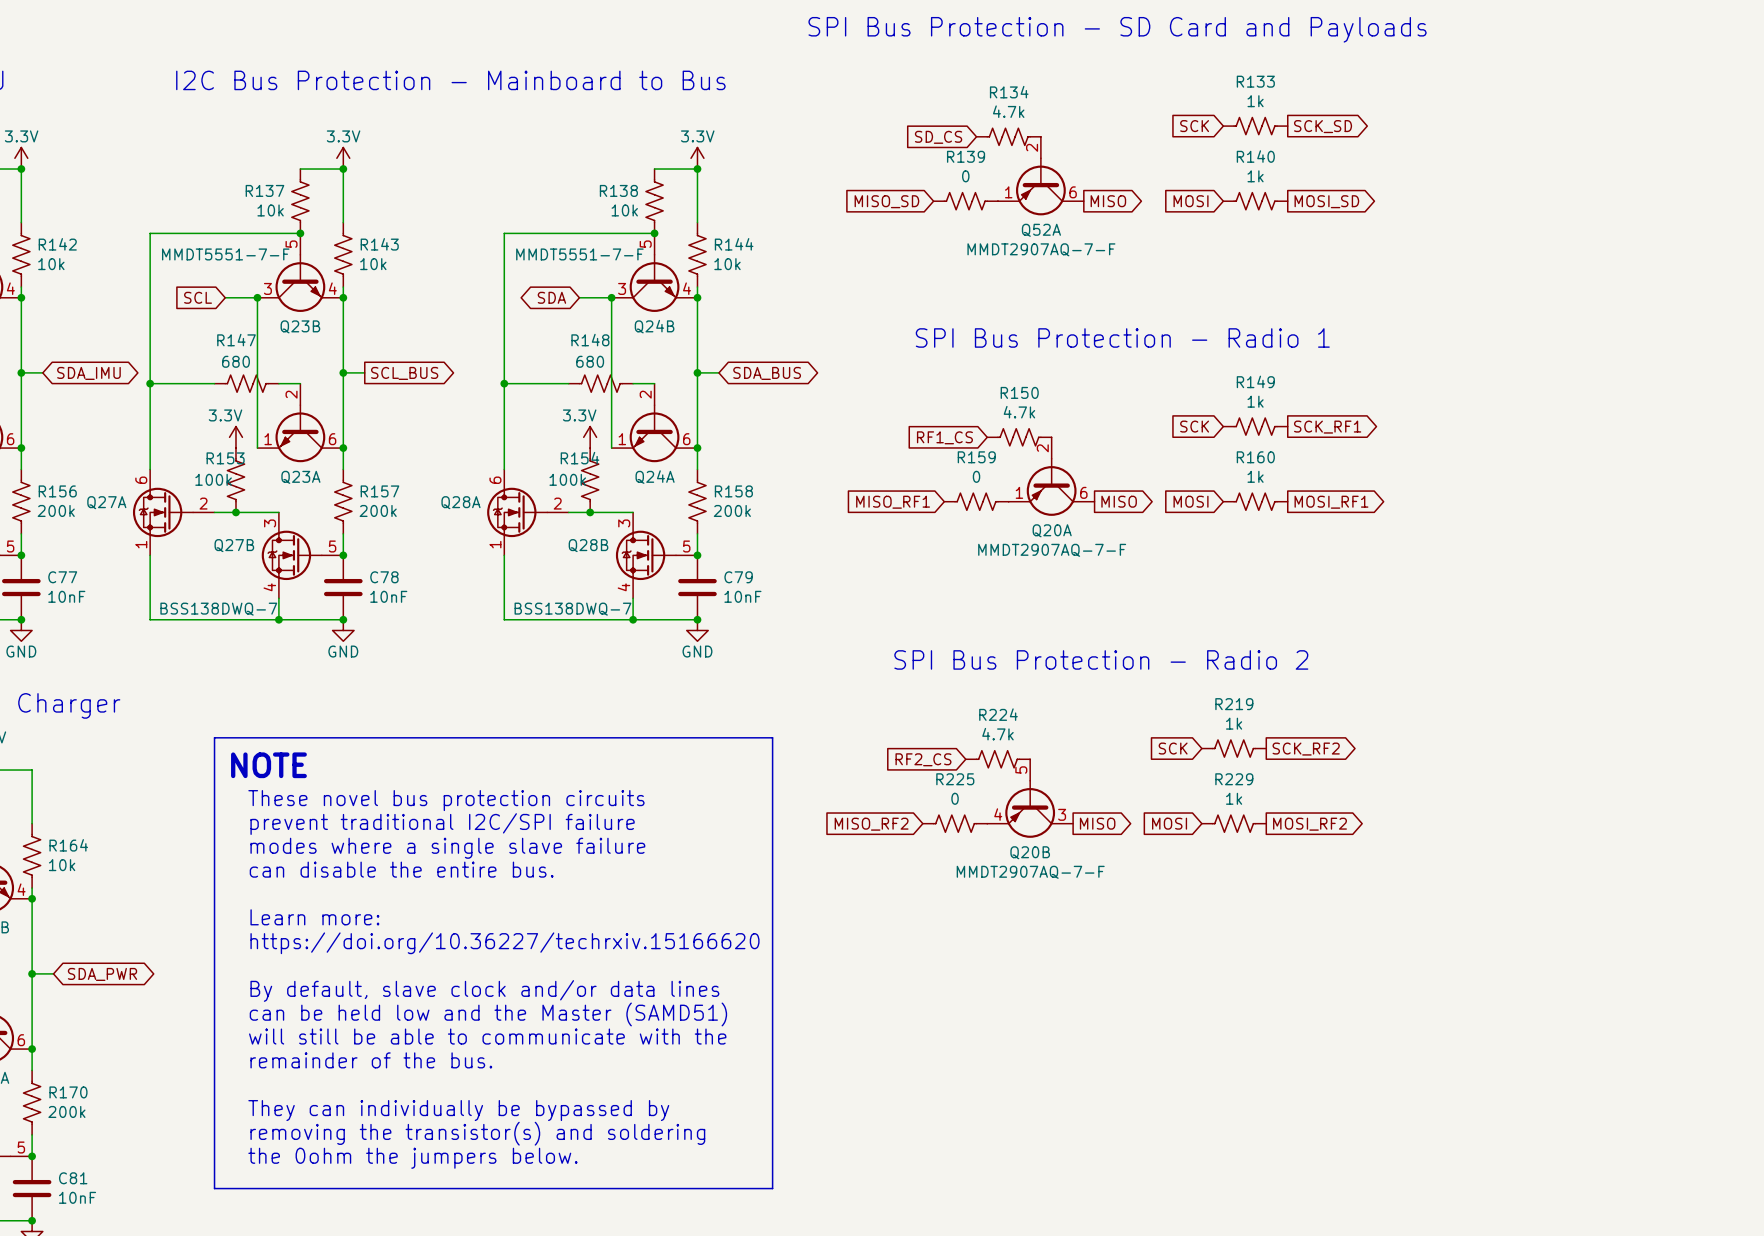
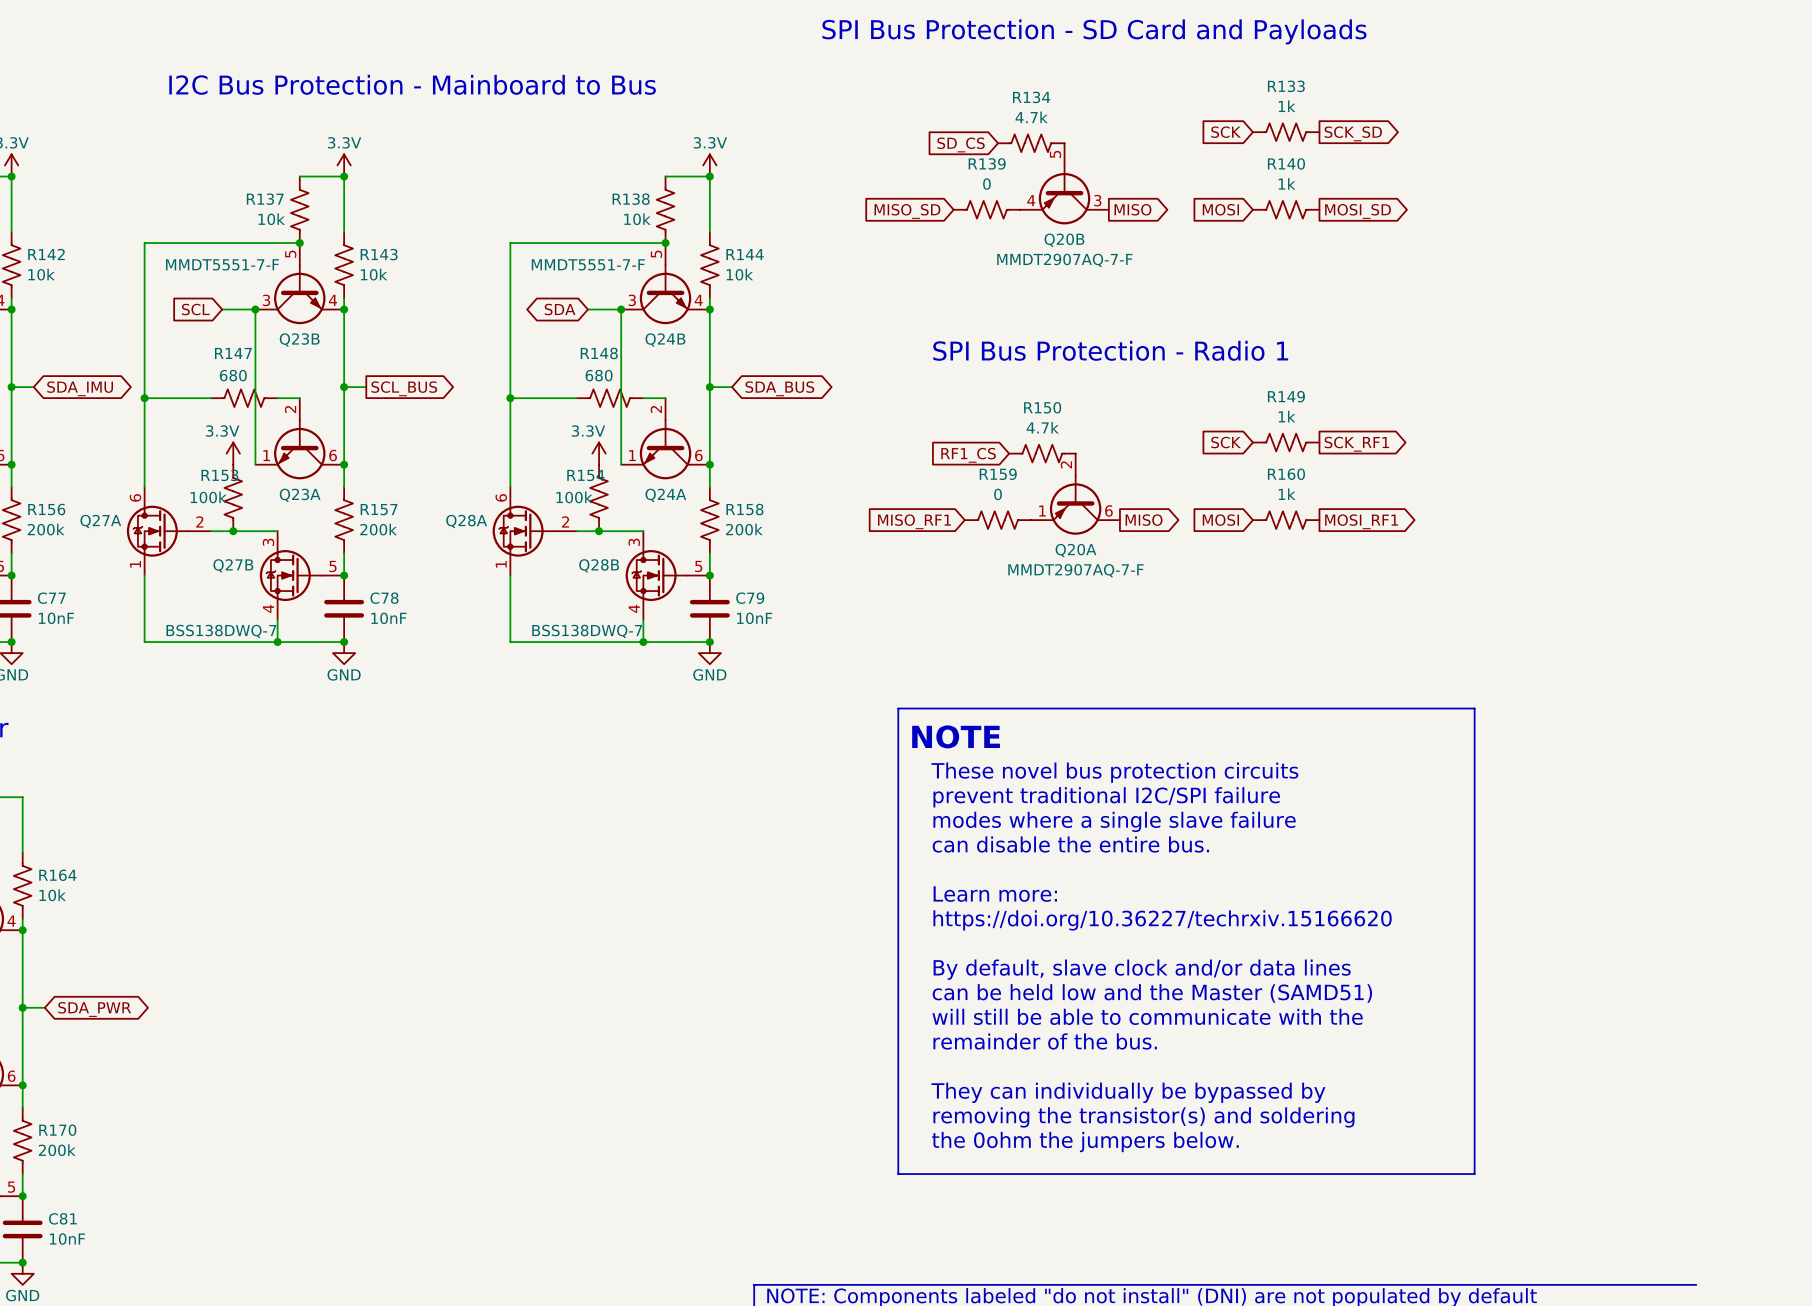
Q52A: MMDT2907AQ-7-F (1040, 176) -> none
text: SPI Bus Protection - Radio 2 (1101, 659) -> none
line: none -> (898, 708) (1474, 708) (1474, 1174) (898, 1174) (898, 708)
text: none -> NOTE (956, 736)
line: (214, 737) (772, 737) (772, 1188) (214, 1188) (214, 737) -> none
text: none -> These novel bus protection circuits (1114, 772)
global label: SCK (1173, 748) -> none
R219: 1k (1234, 748) -> none
global label: SCK_RF2 (1306, 749) -> none
global label: RF2_CS (923, 759) -> none
R224: 4.7k (997, 759) -> none
text: NOTE (268, 765) -> none
text: none -> prevent traditional I2C/SPI failure (1106, 797)
text: none -> modes where a single slave failure (1114, 821)
Q20B position: (1030, 798) -> (1064, 183)
text: These novel bus protection circuits (446, 800) -> none
text: none -> can disable the entire bus. (1070, 844)
R225: 0 (955, 823) -> none
global label: MISO (1097, 823) -> none
global label: MOSI (1169, 823) -> none
R229: 1k (1234, 823) -> none
text: prevent traditional I2C/SPI failure (442, 824) -> none
global label: MISO_RF2 (871, 824) -> none
global label: MOSI_RF2 (1309, 824) -> none
text: modes where a single slave failure (447, 848) -> none
text: none -> Learn more: (995, 894)
text: can disable the entire bus. (401, 869) -> none
text: none -> https://doi.org/10.36227/techrxiv.15166620 (1162, 920)
text: Learn more: (314, 917) -> none
text: none -> By default, slave clock and/or data lines (1142, 969)
text: https://doi.org/10.36227/techrxiv.15166620 (504, 943) -> none
text: none -> can be held low and the Master (SAMD51) (1152, 993)
text: none -> will still be able to communicate with the (1147, 1016)
text: By default, slave clock and/or data lines (484, 990) -> none
text: none -> remainder of the bus. (1045, 1041)
text: can be held low and the Master (SAMD51) (488, 1014) -> none
text: will still be able to communicate with the (487, 1036) -> none
text: none -> They can individually be bypassed by (1128, 1092)
text: remainder of the bus. (371, 1060) -> none
text: none -> removing the transistor(s) and soldering (1143, 1117)
text: none -> the 0ohm the jumpers below. (1085, 1142)
text: They can individually be bypassed by (458, 1110) -> none
text: removing the transistor(s) and soldering (477, 1133) -> none
text: the 0ohm the jumpers below. (412, 1158) -> none

